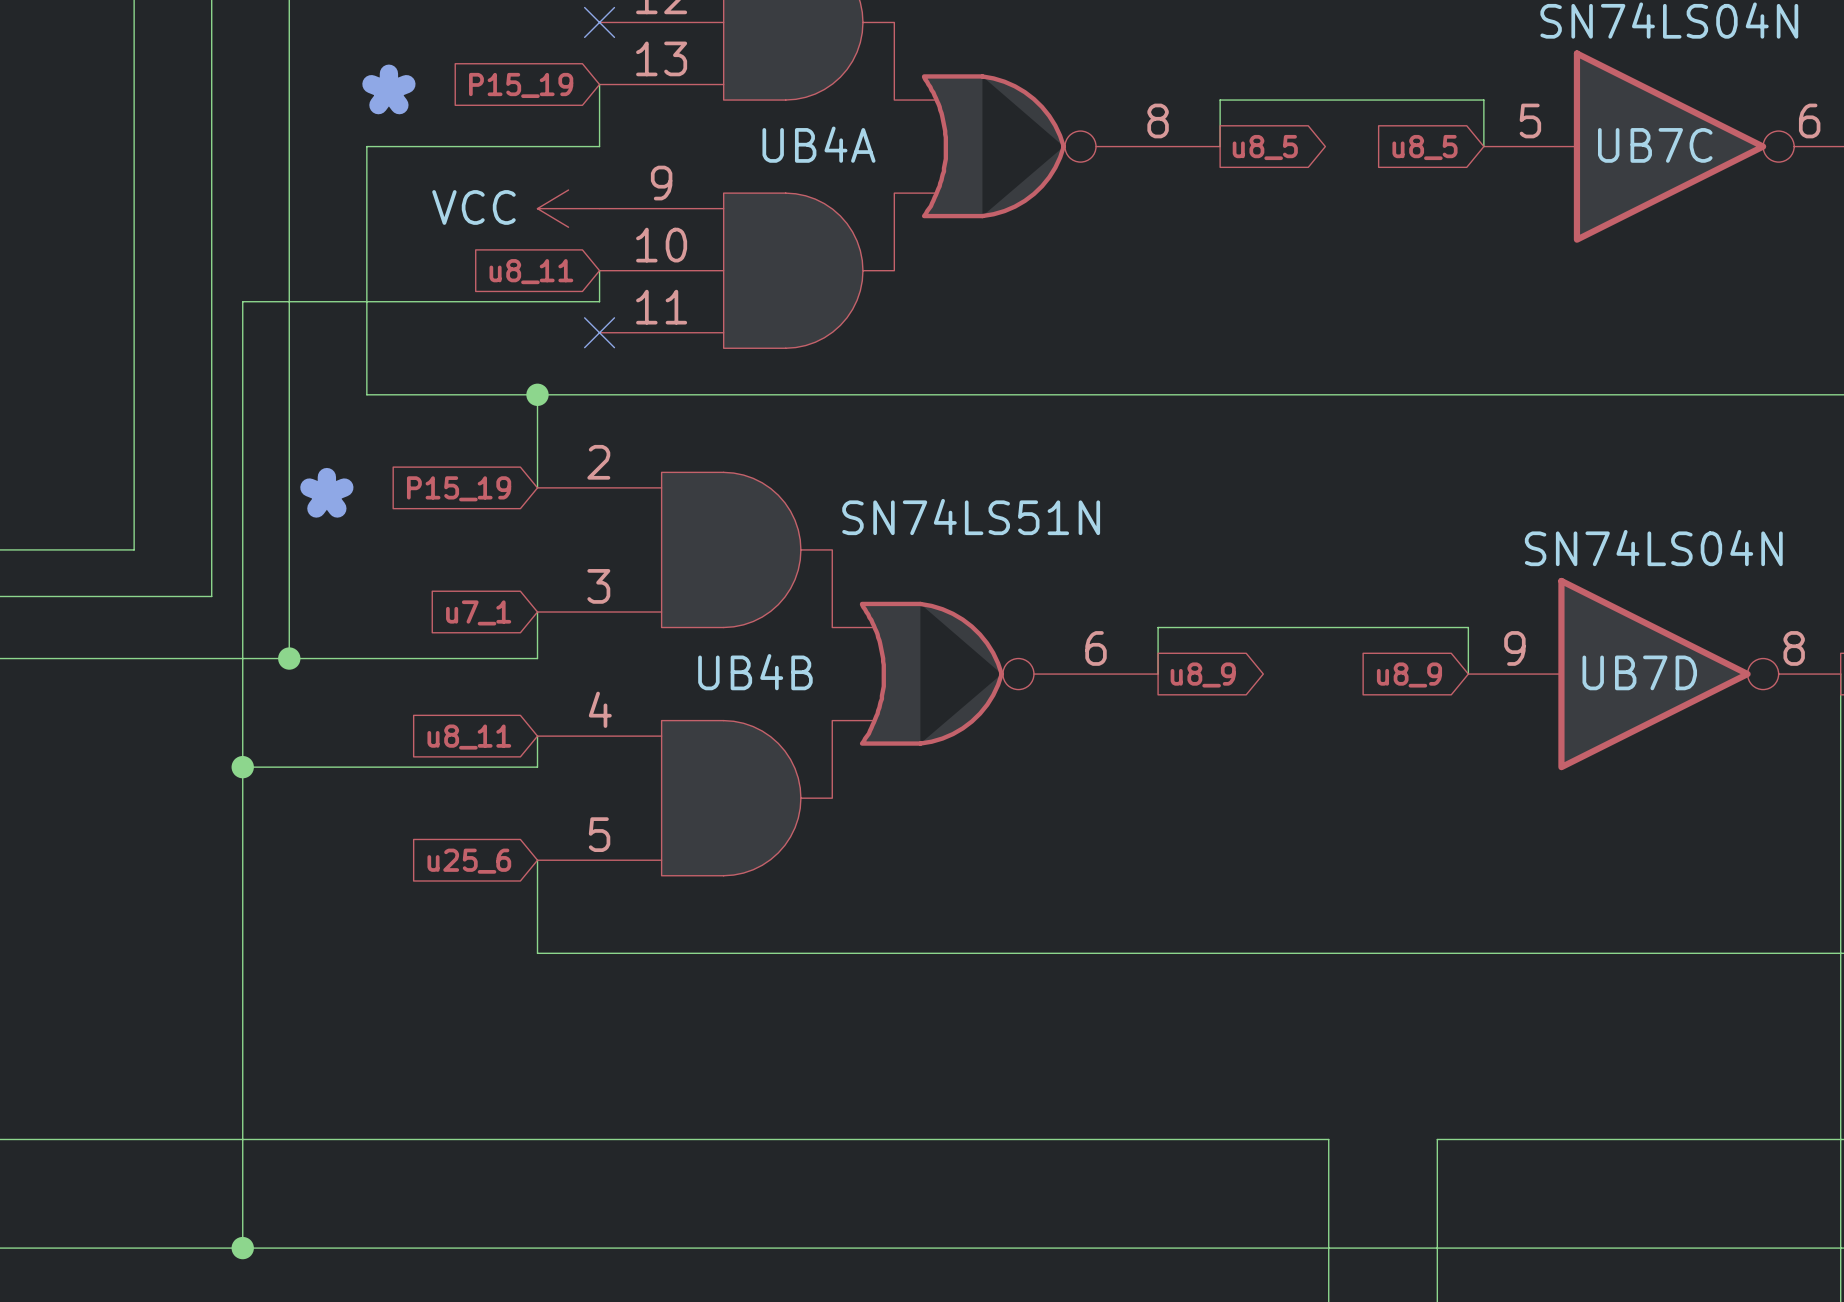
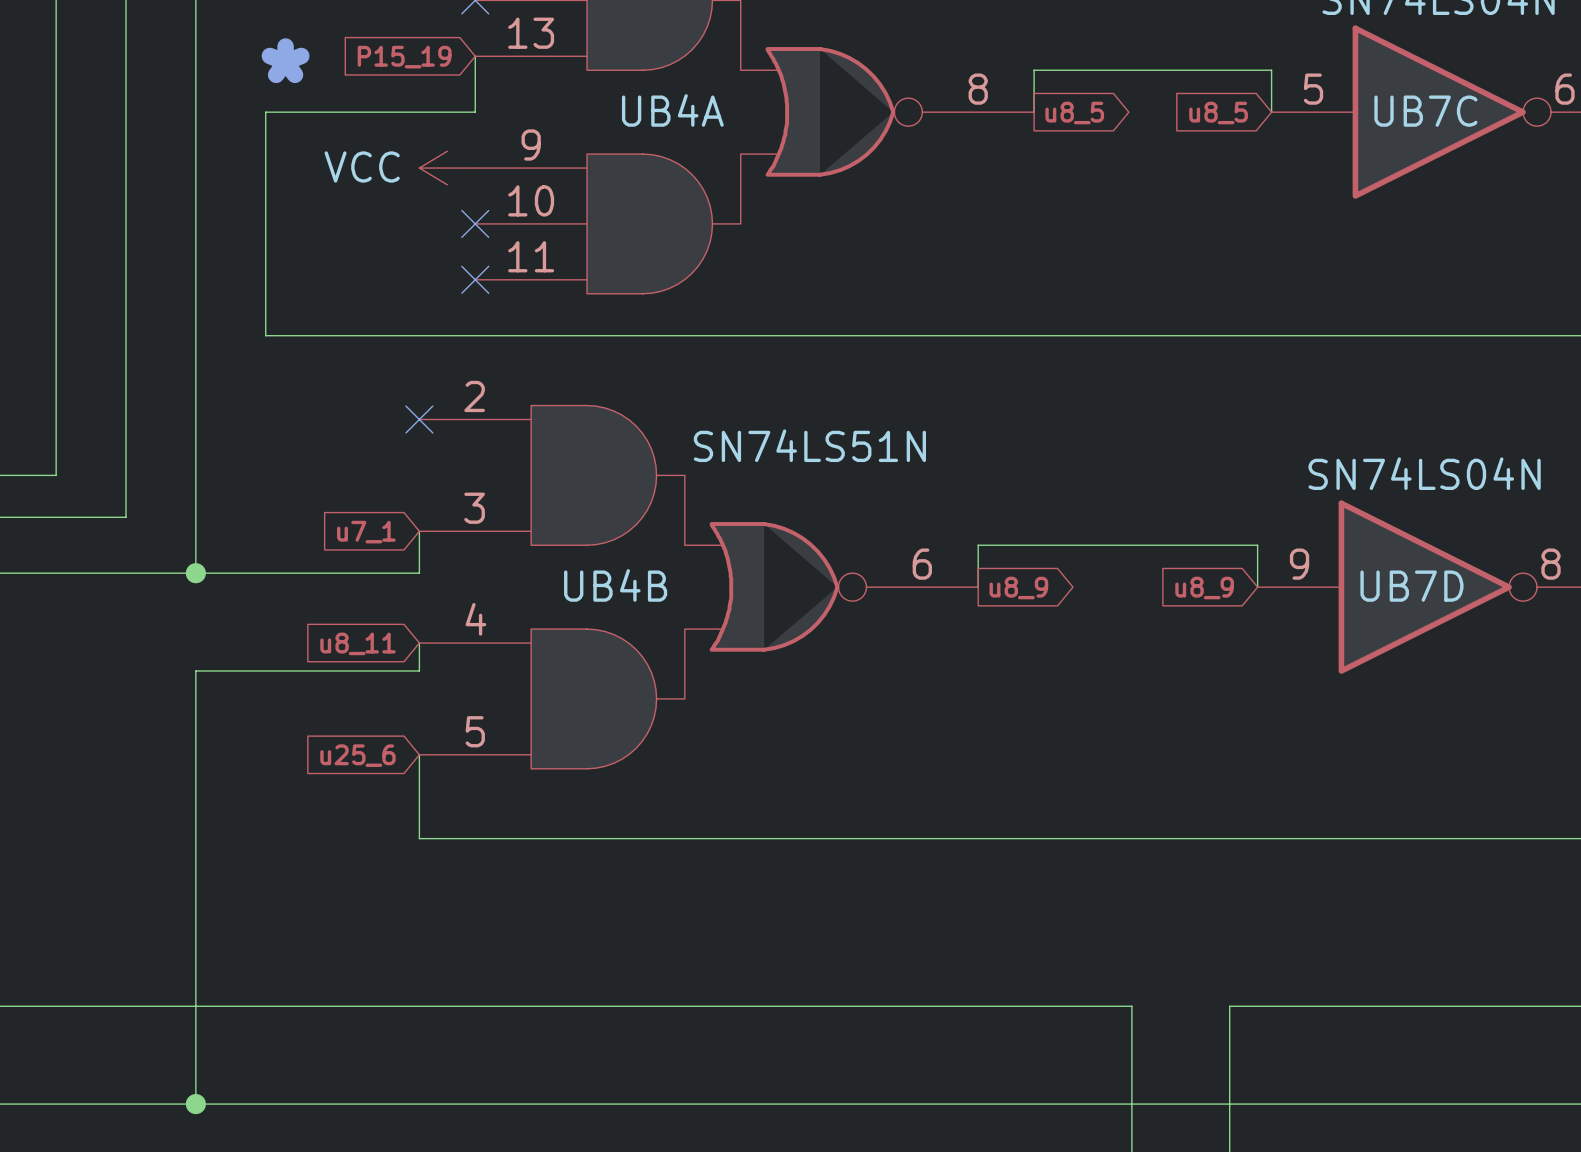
wire: (599, 270) (599, 301) (242, 301) (242, 1248) -> none
no-connect mark: none -> (475, 223)
global label: u8_11 (531, 271) -> none
wire: (537, 394) (537, 487) -> none
junction: (537, 394) -> none
no-connect mark: none -> (419, 419)
global label: P15_19 (459, 488) -> none
text: * (326, 492) -> none
wire: (242, 767) (289, 767) -> (195, 1104) (195, 670)
junction: (242, 767) -> none
junction position: (242, 1248) -> (195, 1104)

